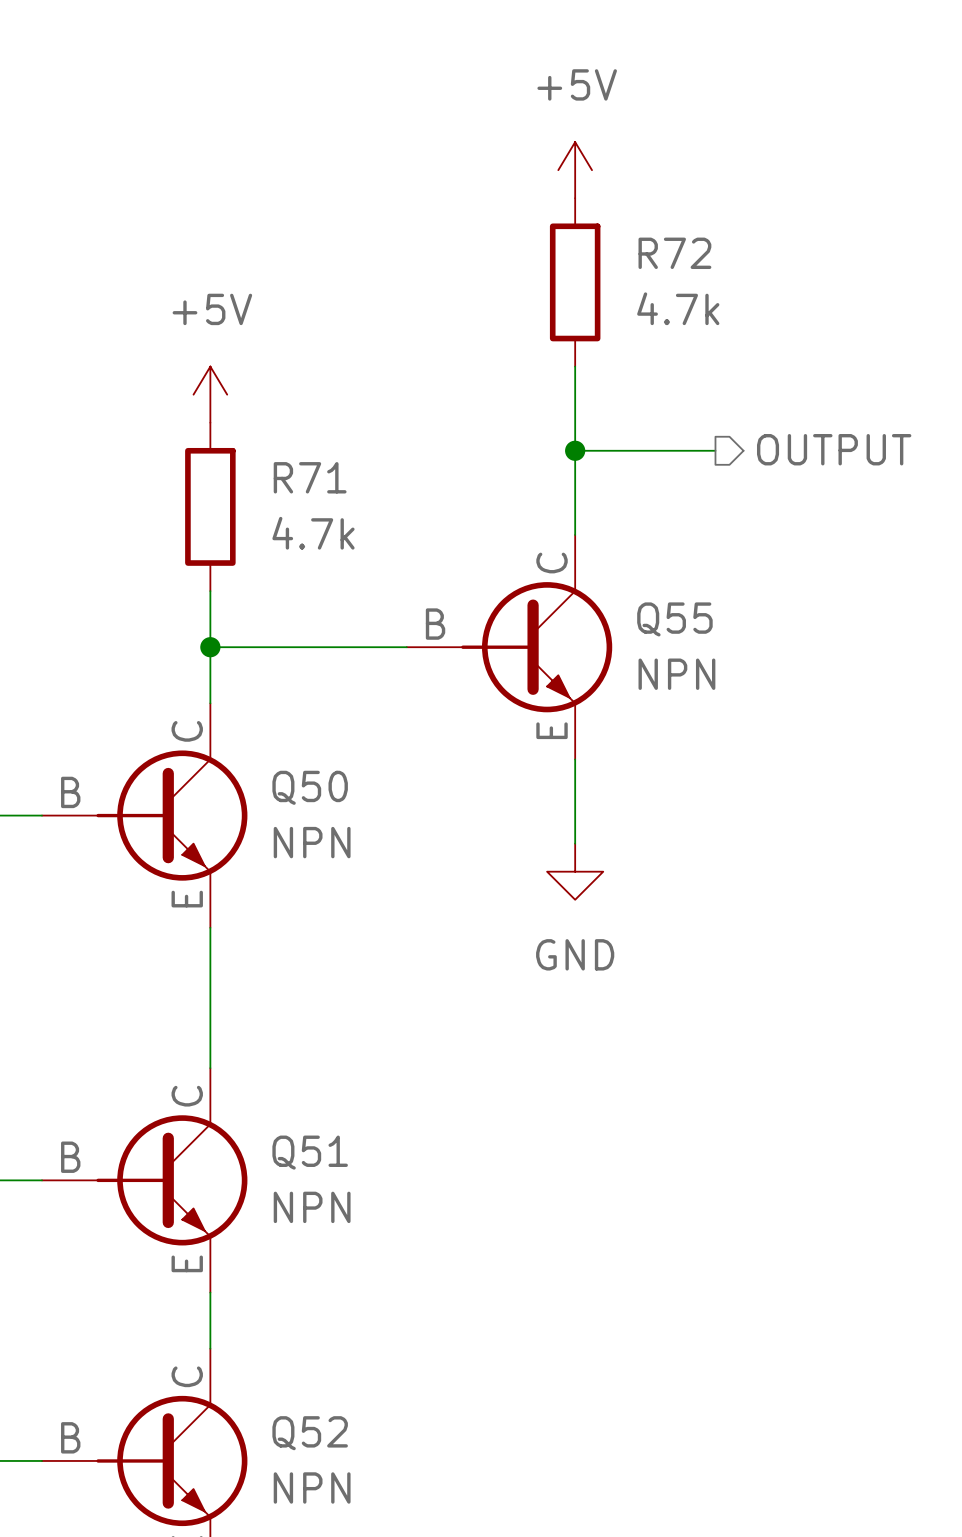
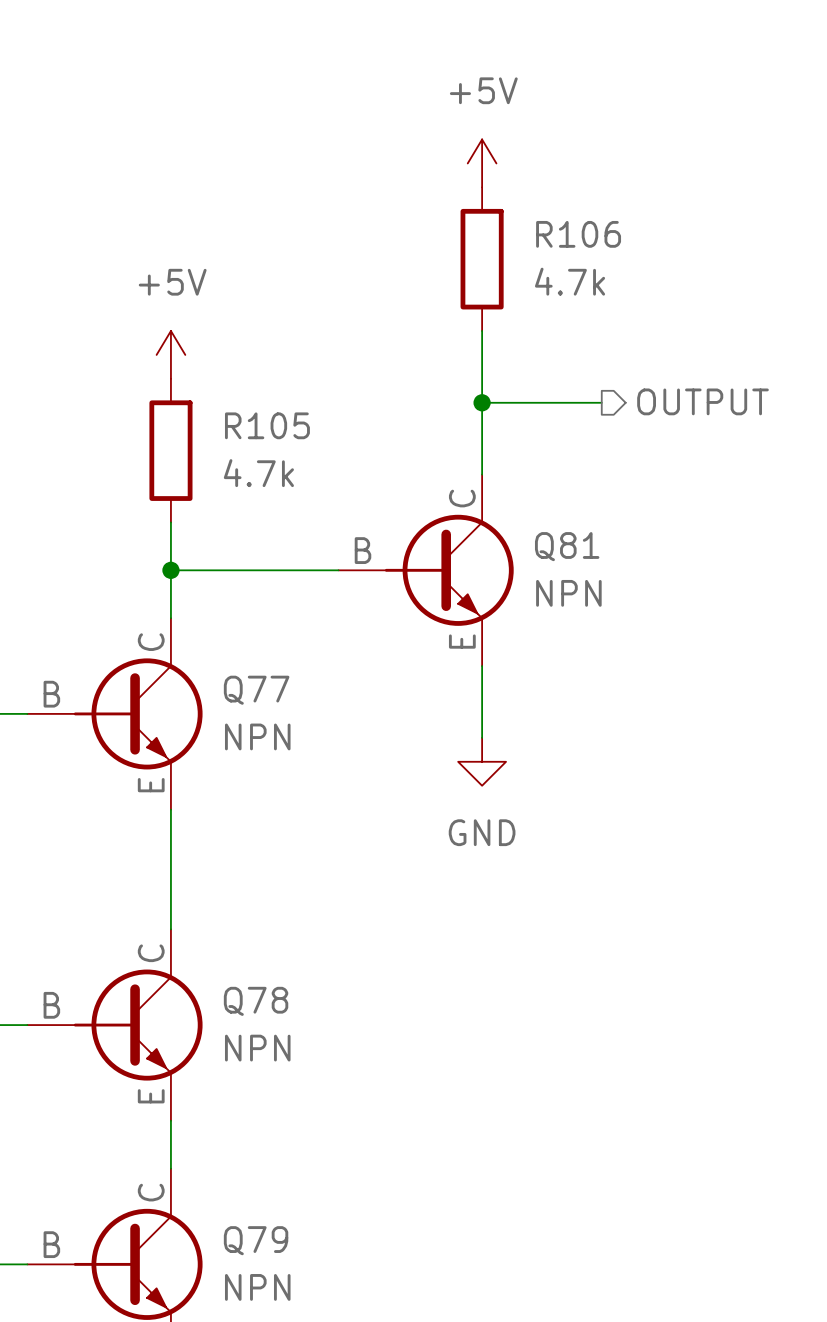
R72 name: R72 (674, 253) -> R106 (578, 234)
R71 name: R71 (310, 477) -> R105 (267, 425)
Q55 name: Q55 (674, 619) -> Q81 (567, 546)
Q50 name: Q50 (310, 787) -> Q77 (256, 690)
Q51 name: Q51 (310, 1152) -> Q78 (256, 1001)
Q52 name: Q52 (310, 1433) -> Q79 (256, 1240)

